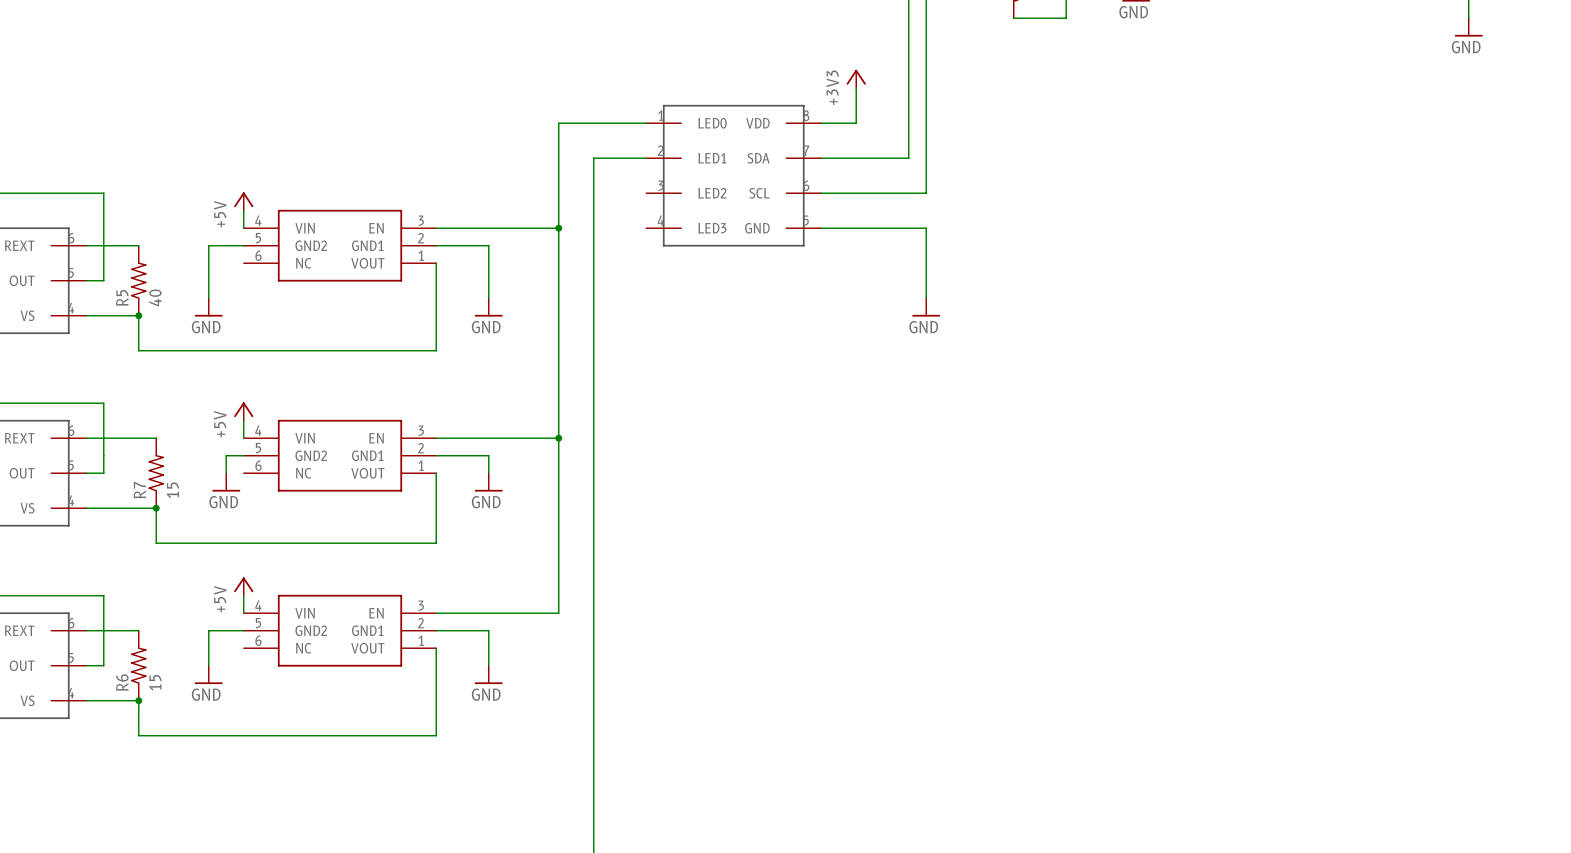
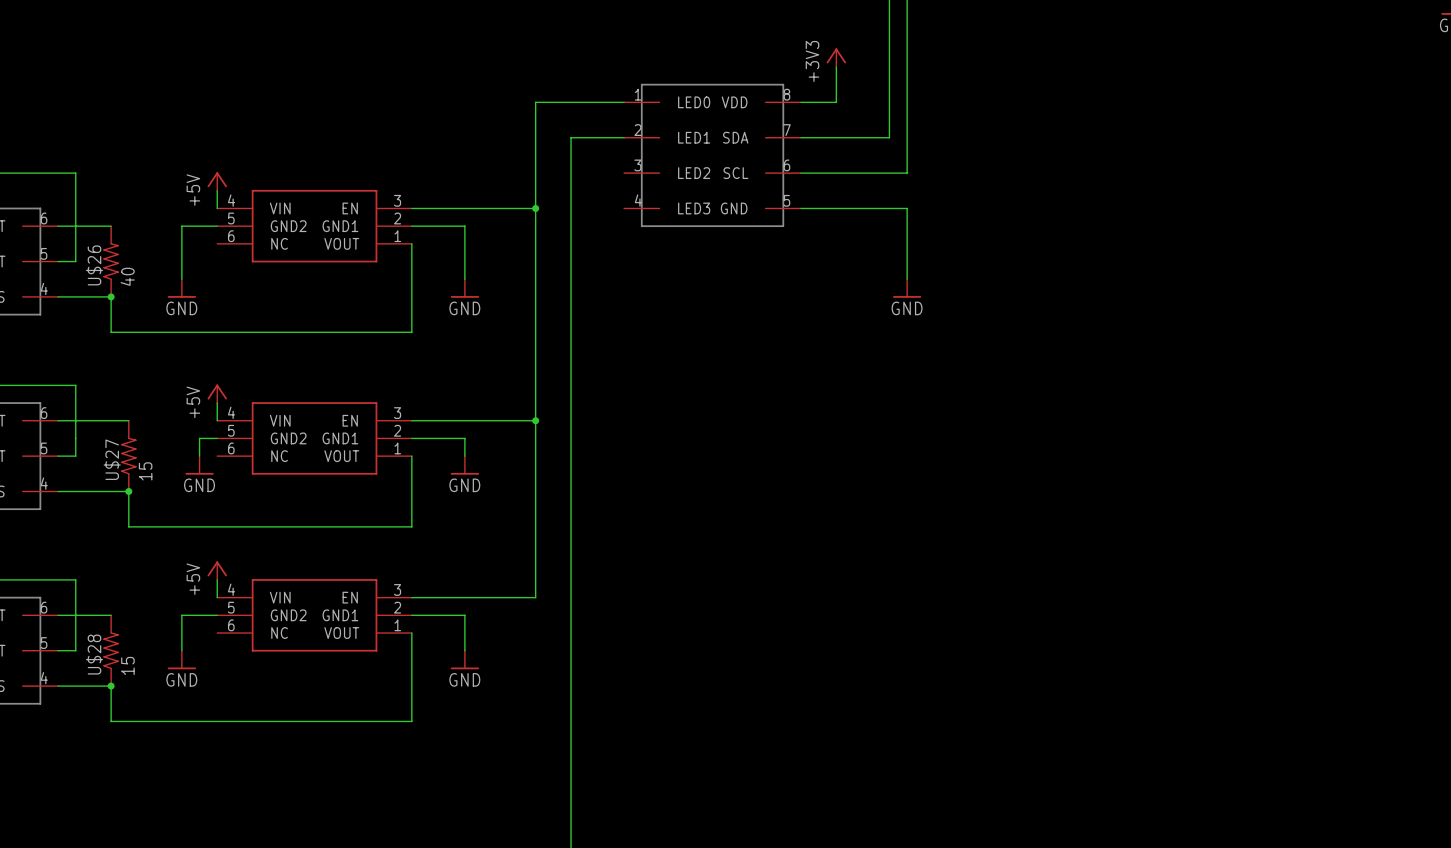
R5 name: R5 (122, 297) -> U$26 (94, 265)
R7 name: R7 (139, 490) -> U$27 (112, 459)
R6 name: R6 (122, 682) -> U$28 (94, 654)

